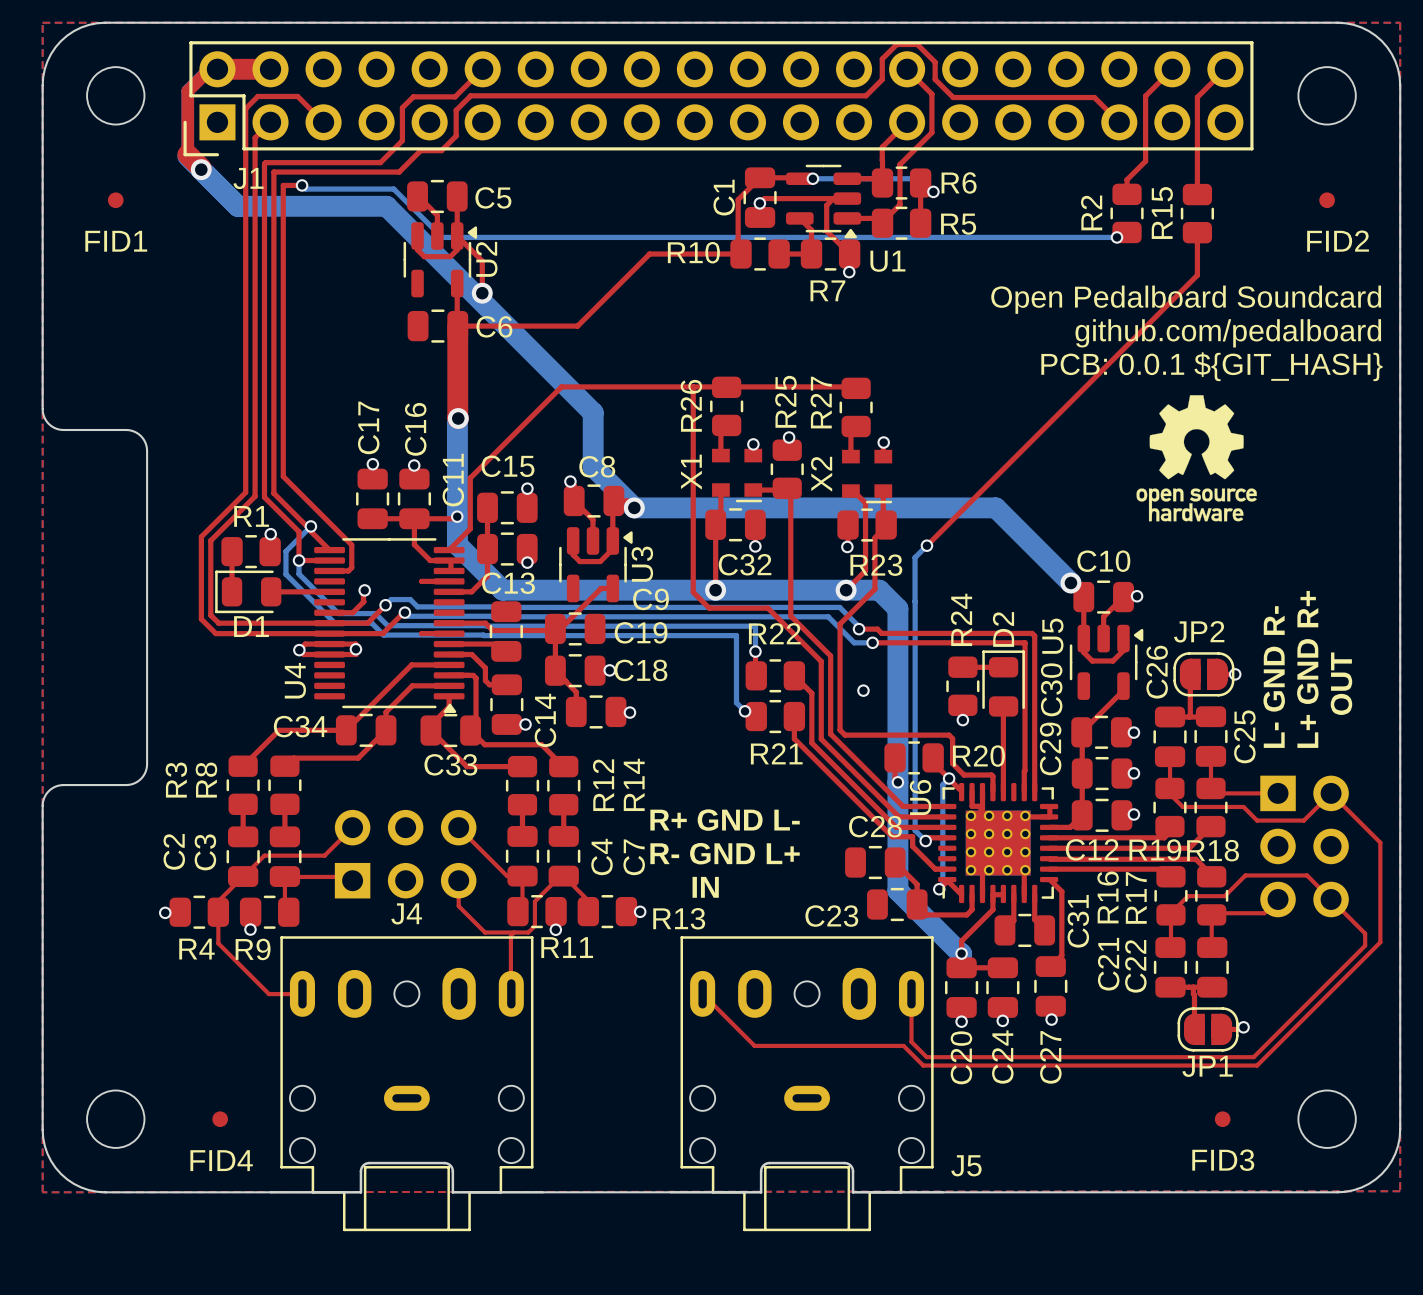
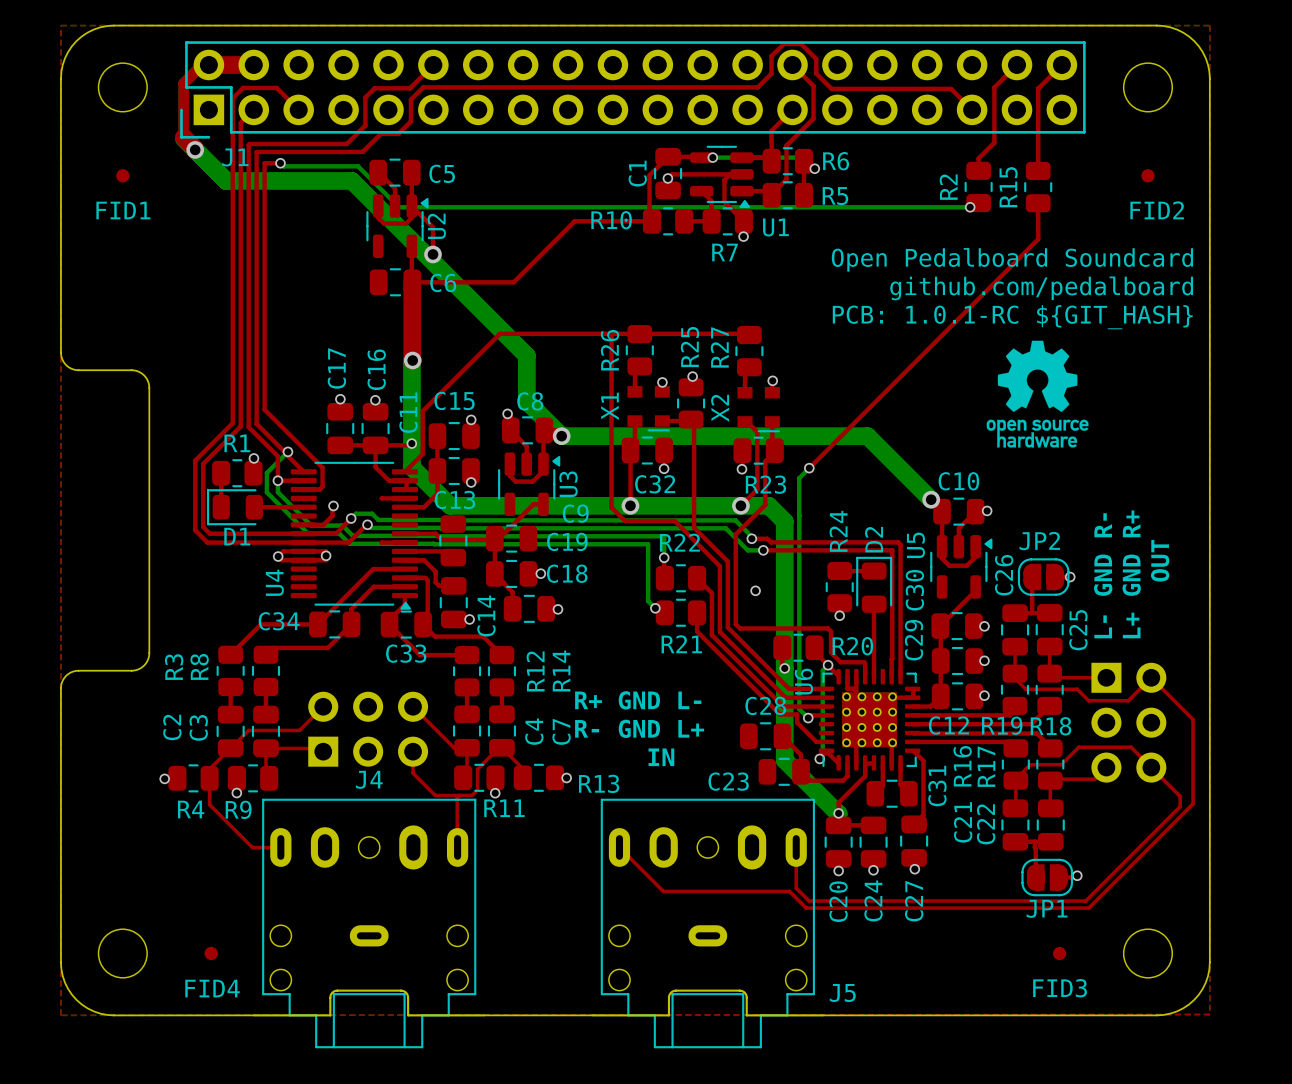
text: PCB: 0.0.1 ${GIT_HASH} (1211, 366) -> PCB: 1.0.1-RC ${GIT_HASH} (1012, 317)

